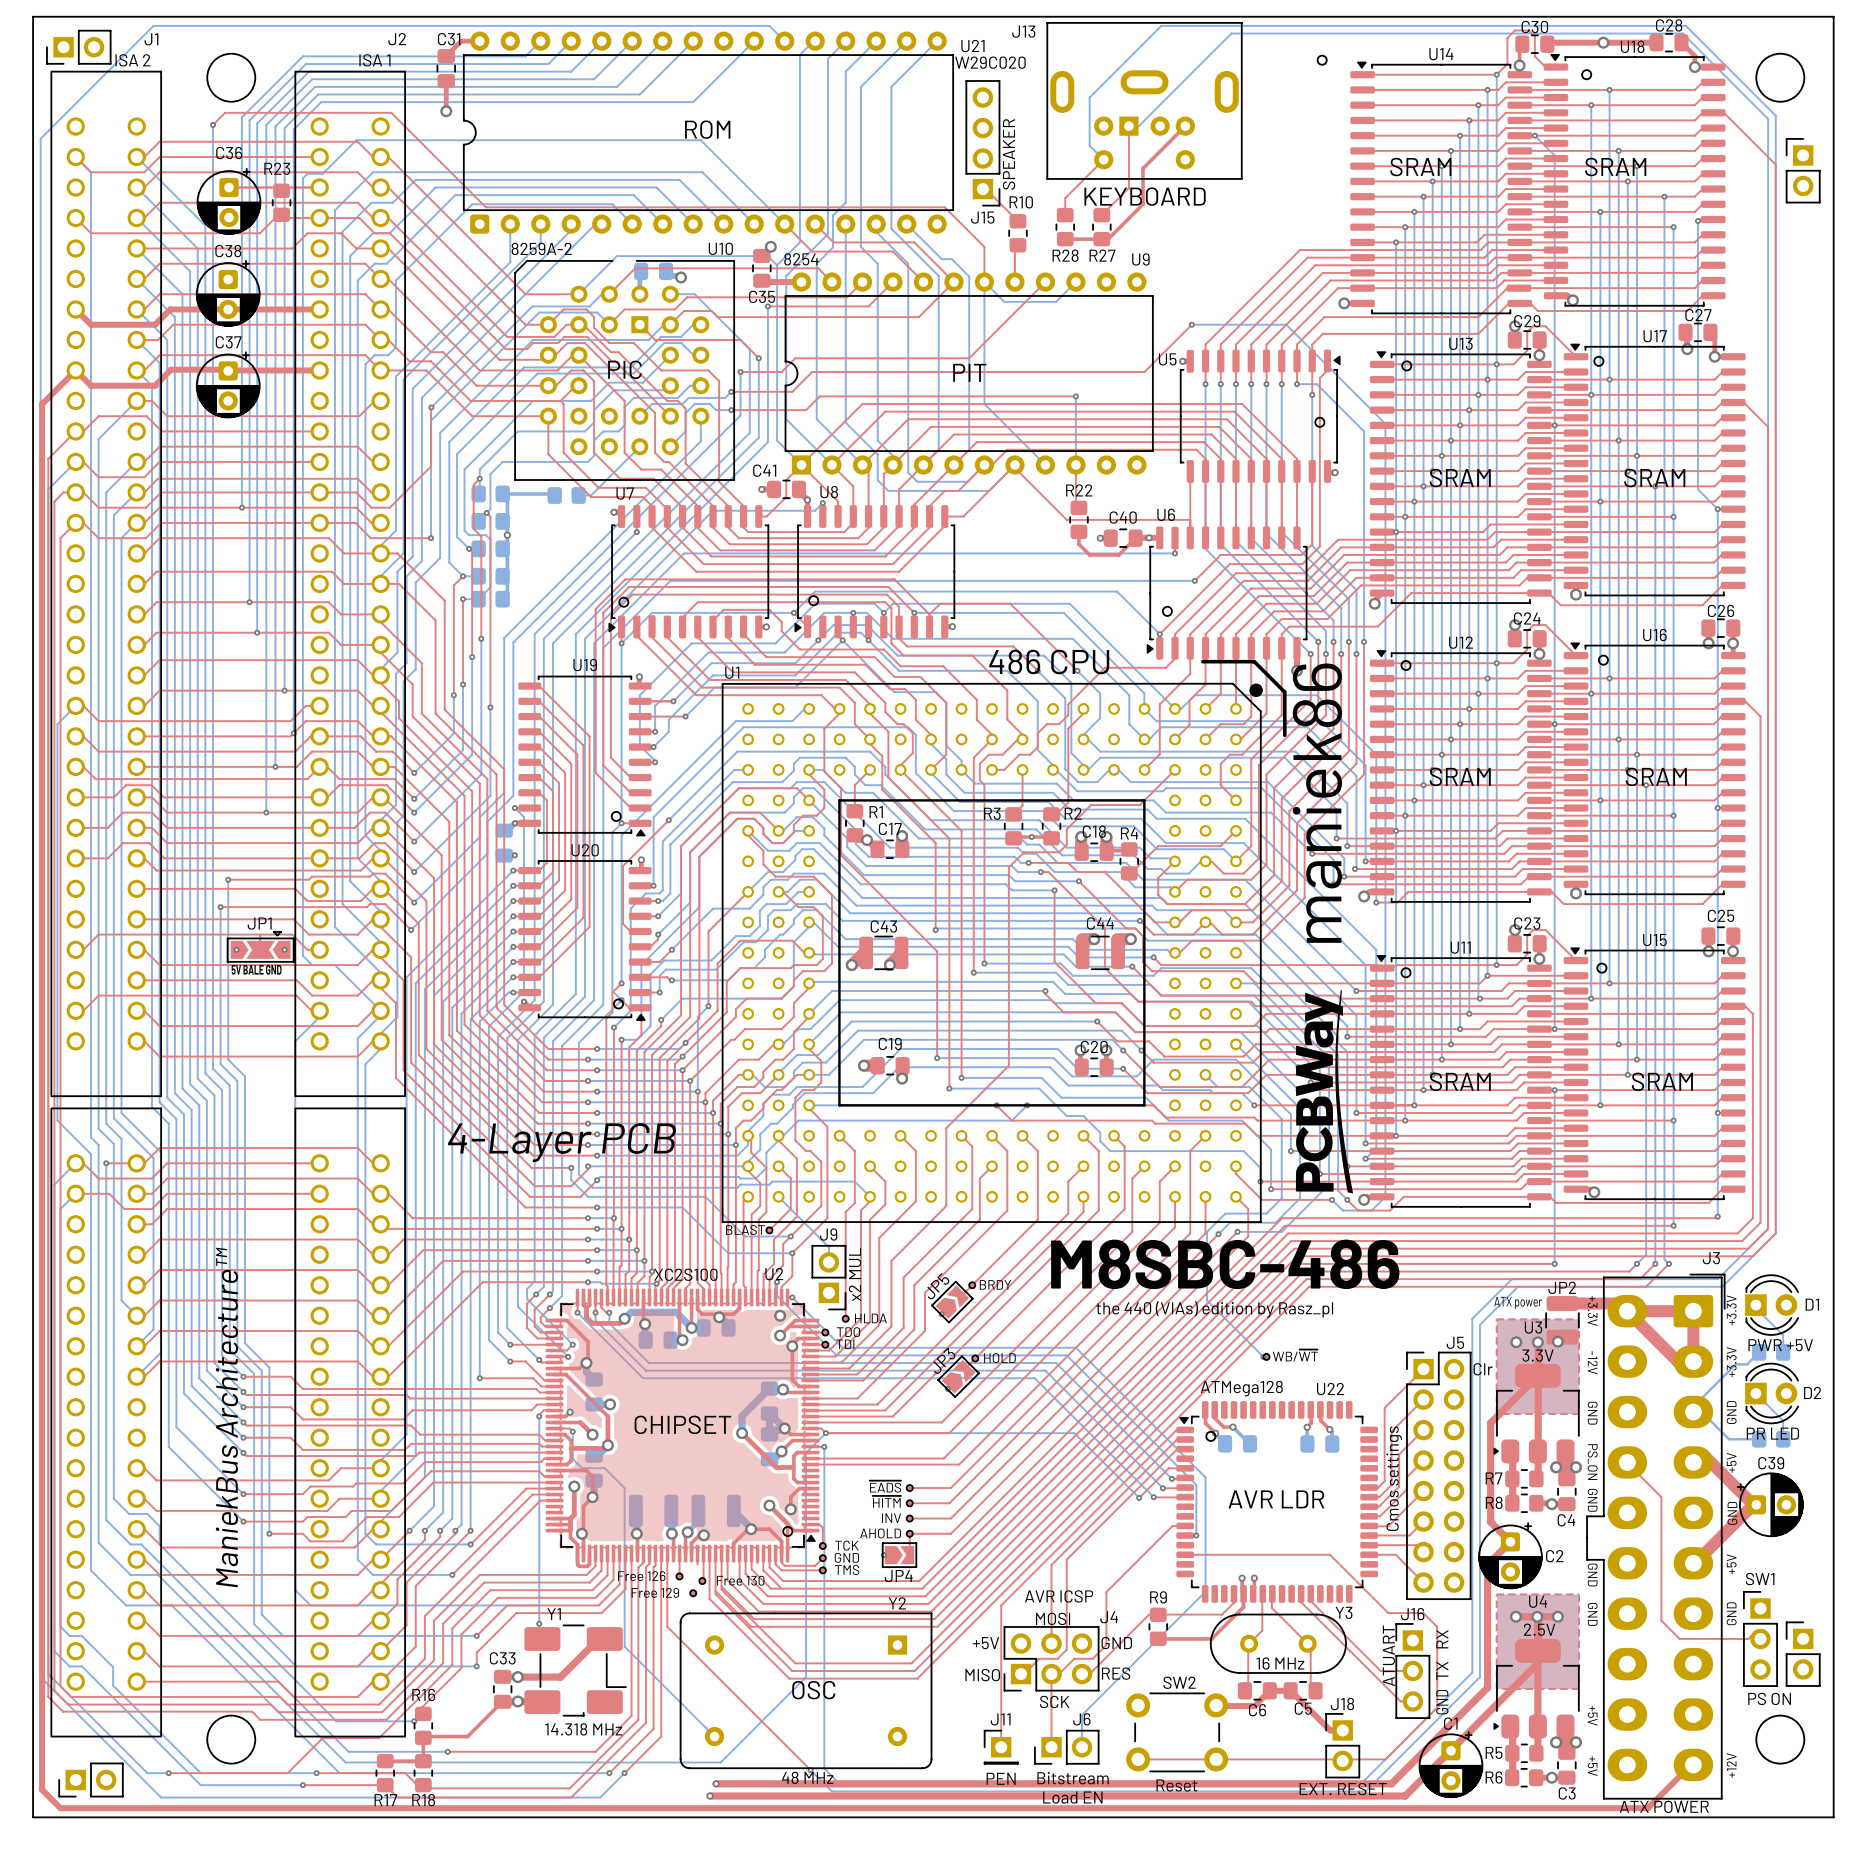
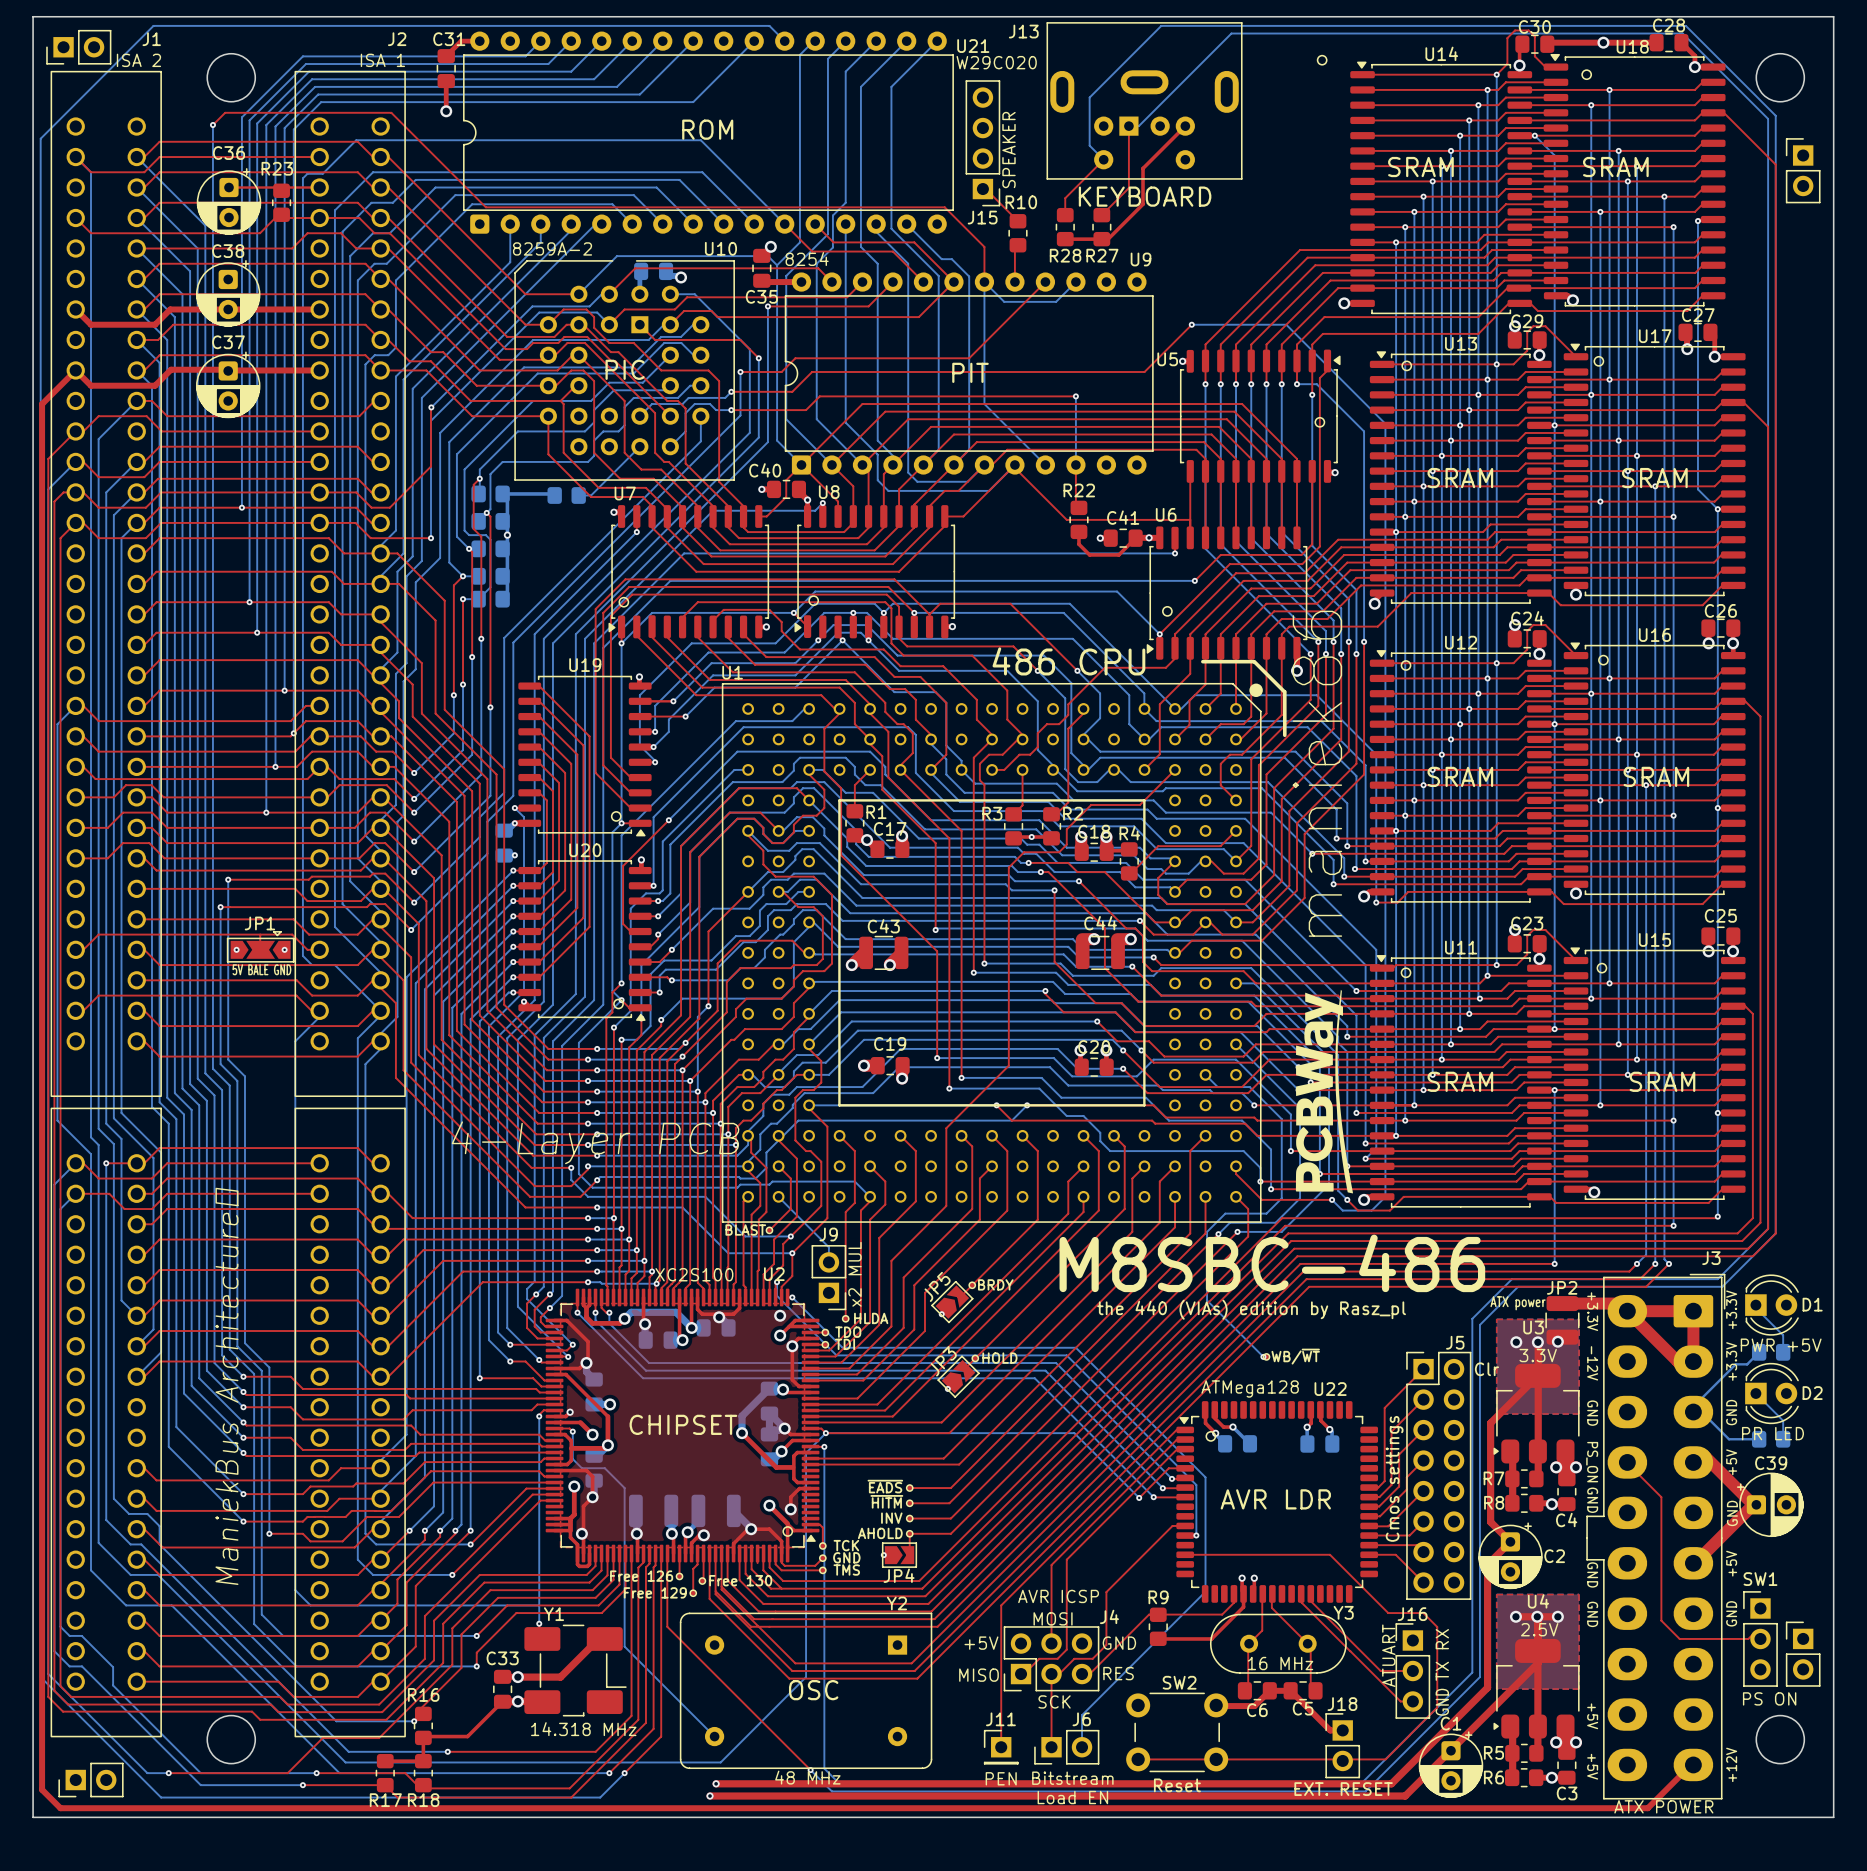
C41 name: C41 (764, 470) -> C40 (765, 470)
C40 name: C40 (1123, 517) -> C41 (1123, 517)
top track: none -> (697, 1564) (693, 1568) (693, 1593)

